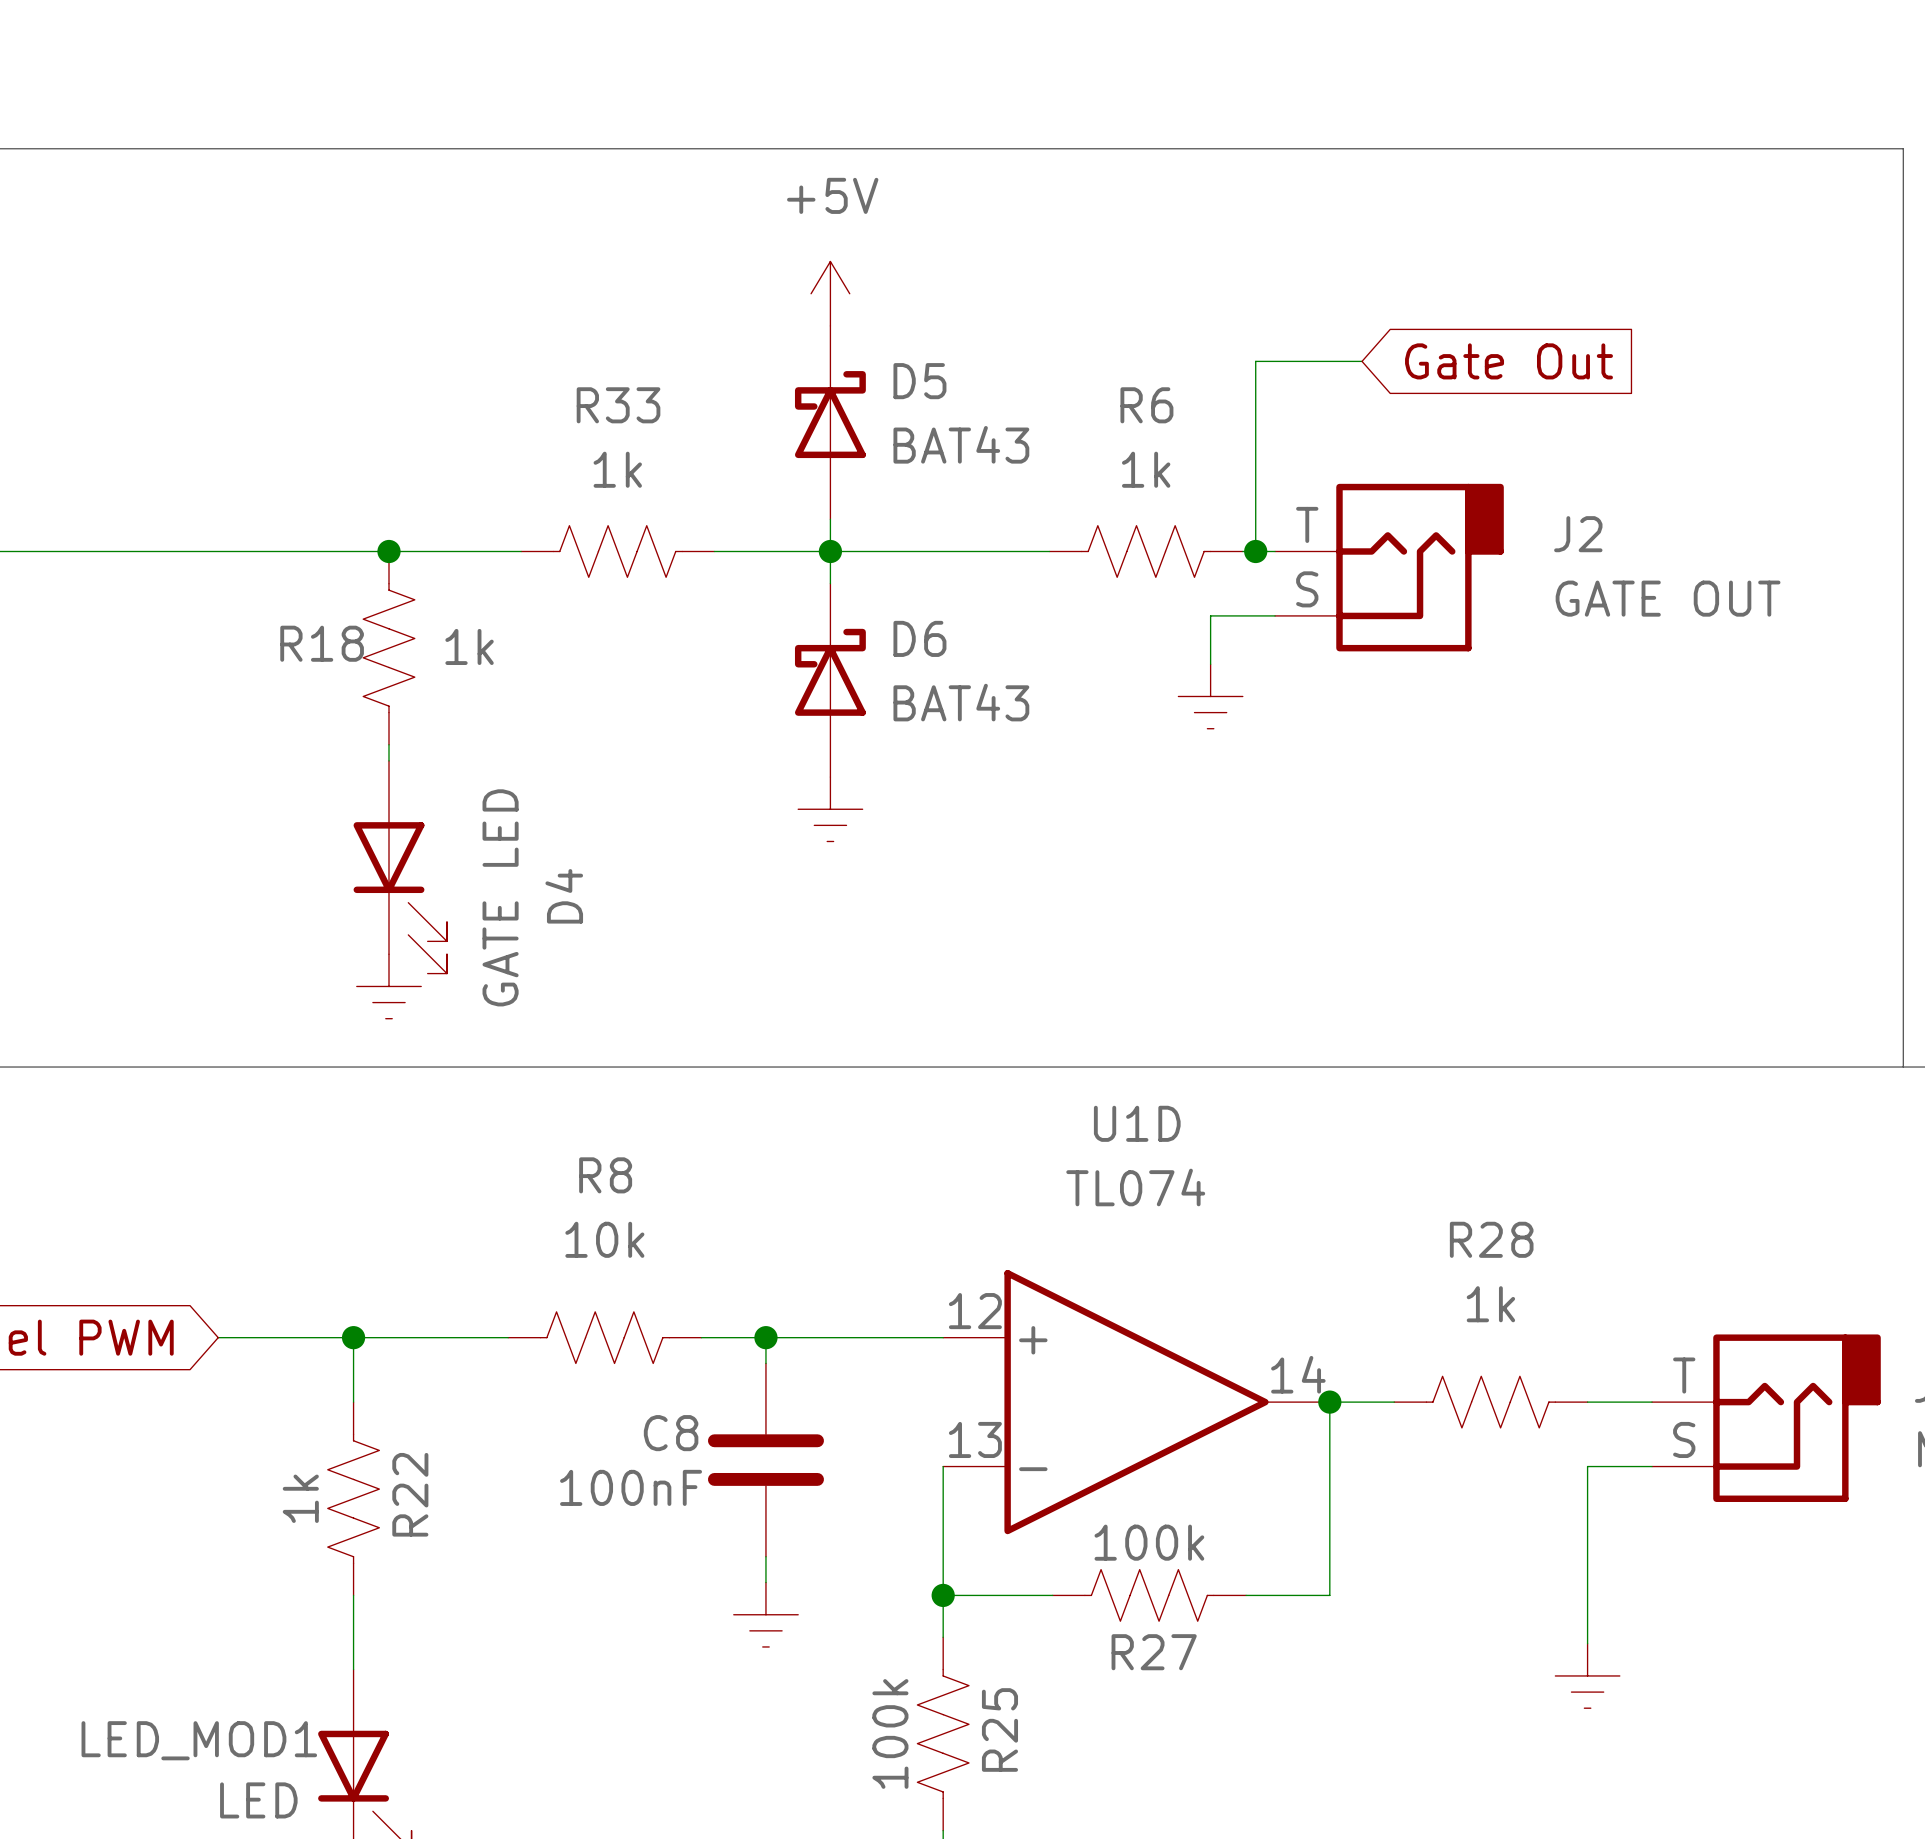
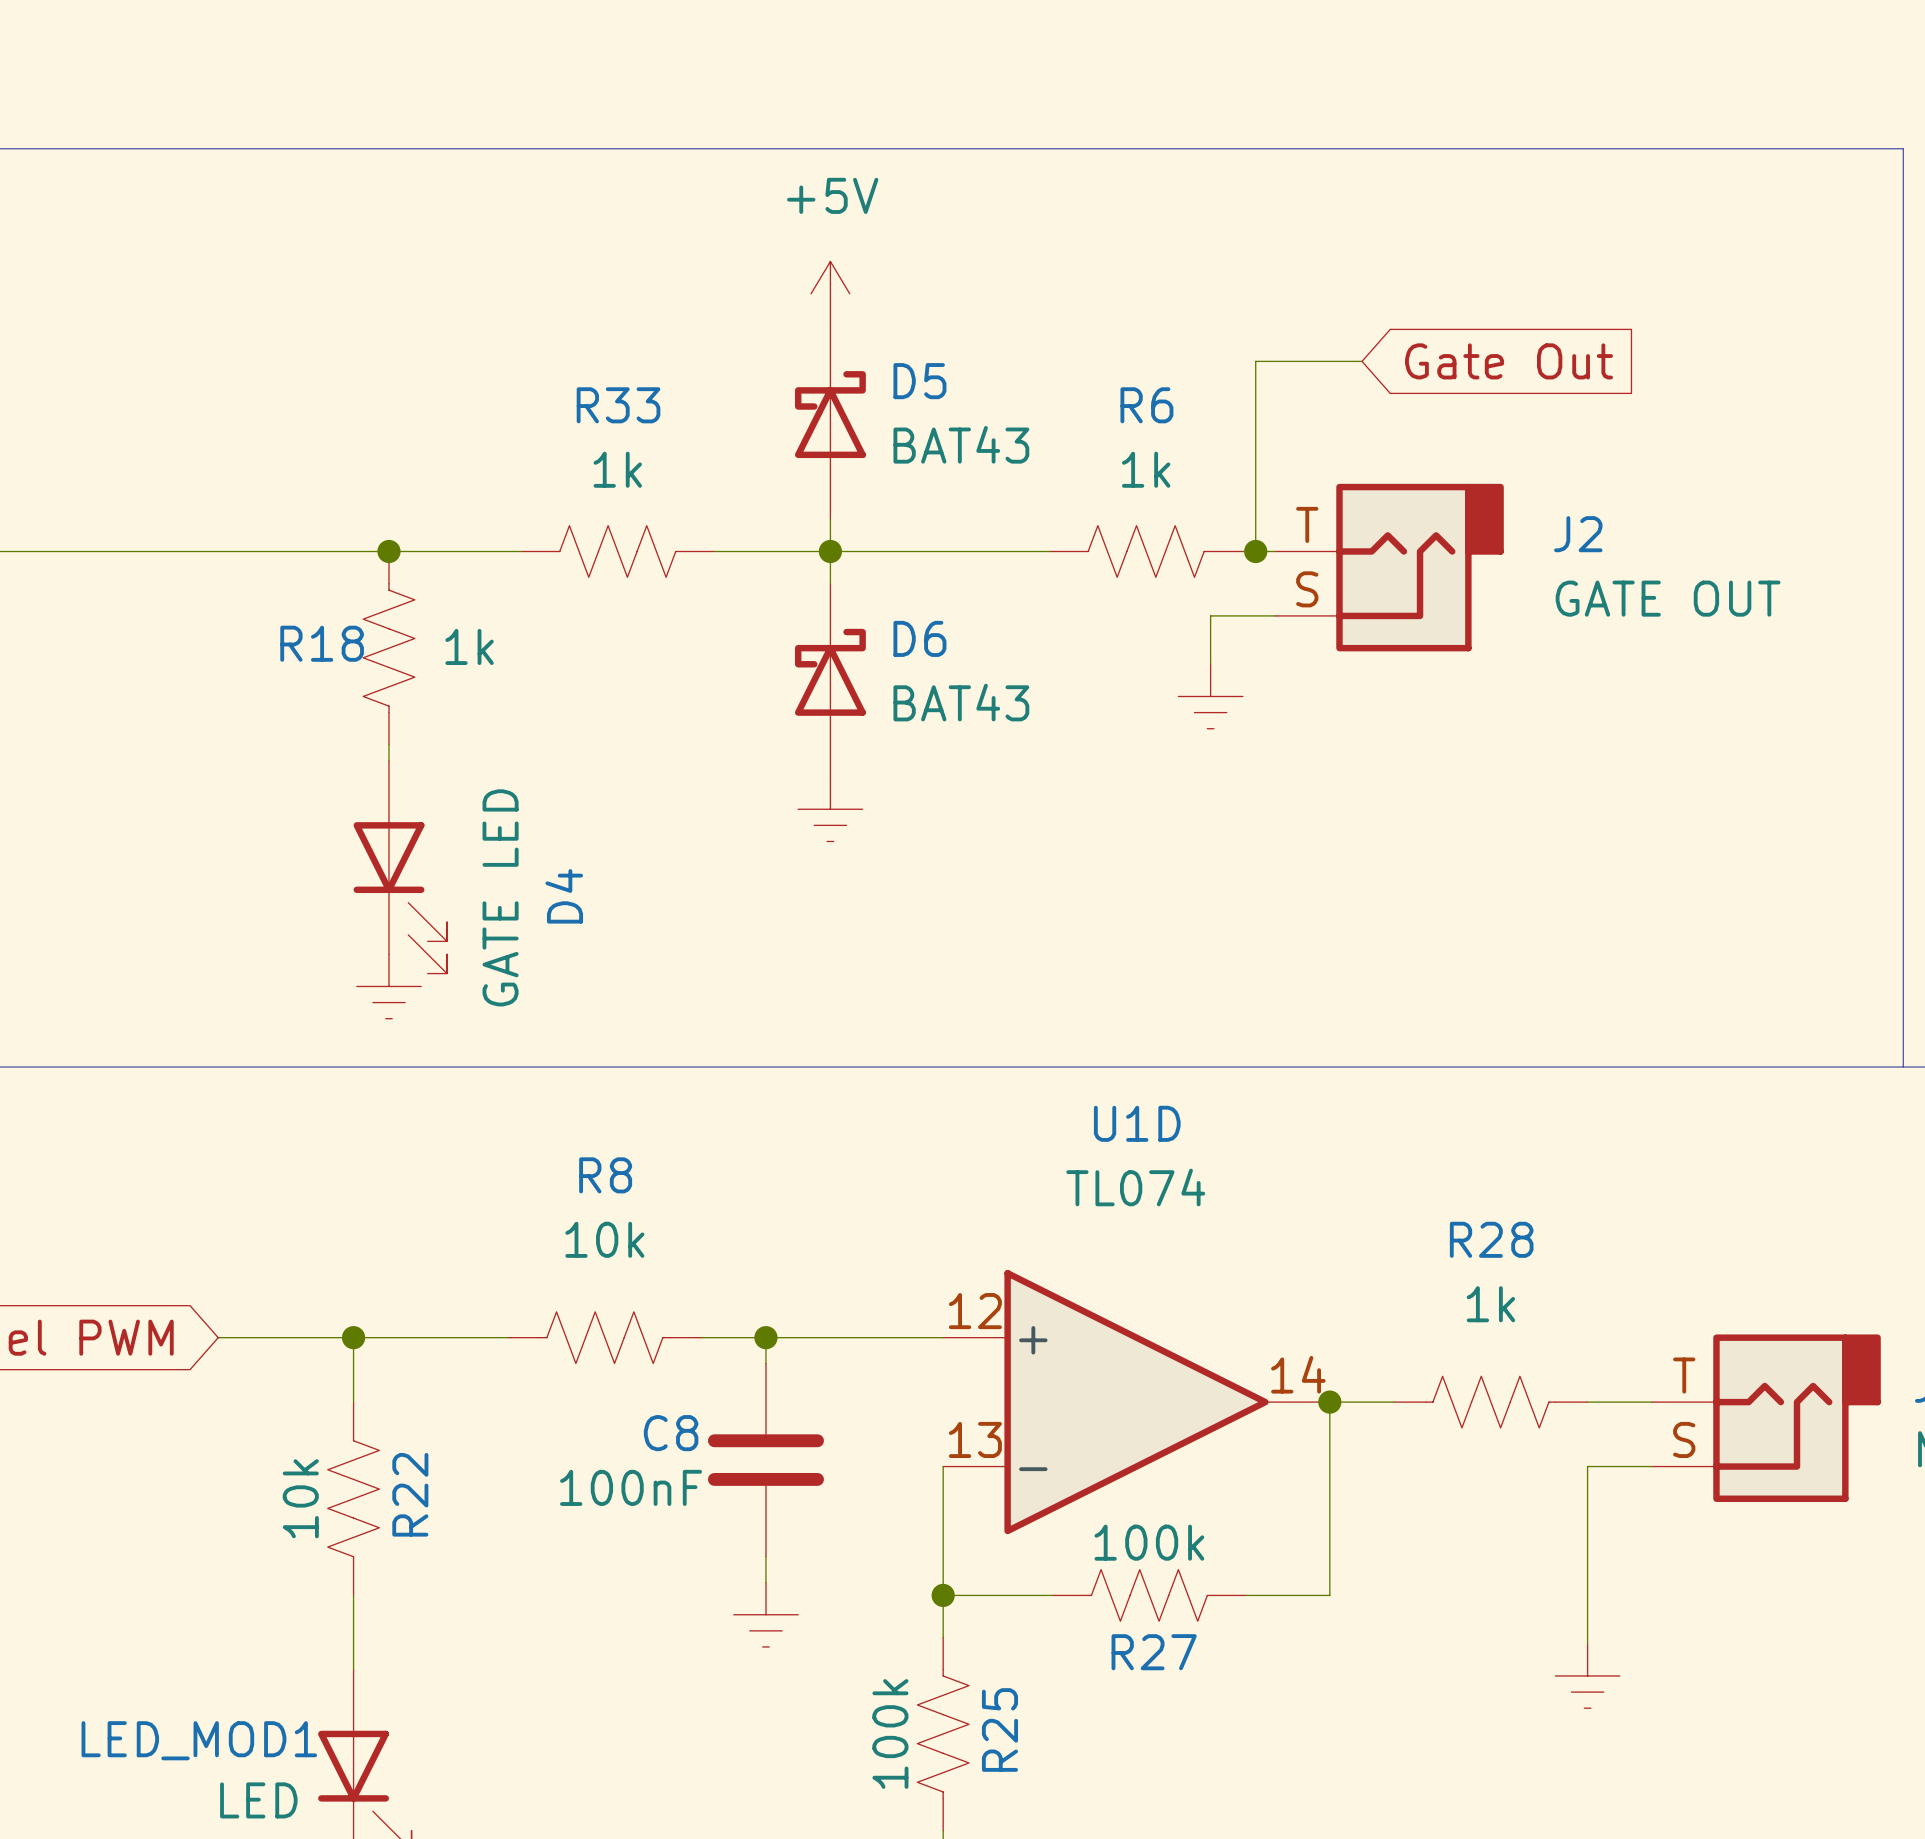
R22 value: 1k (300, 1498) -> 10k (300, 1498)

